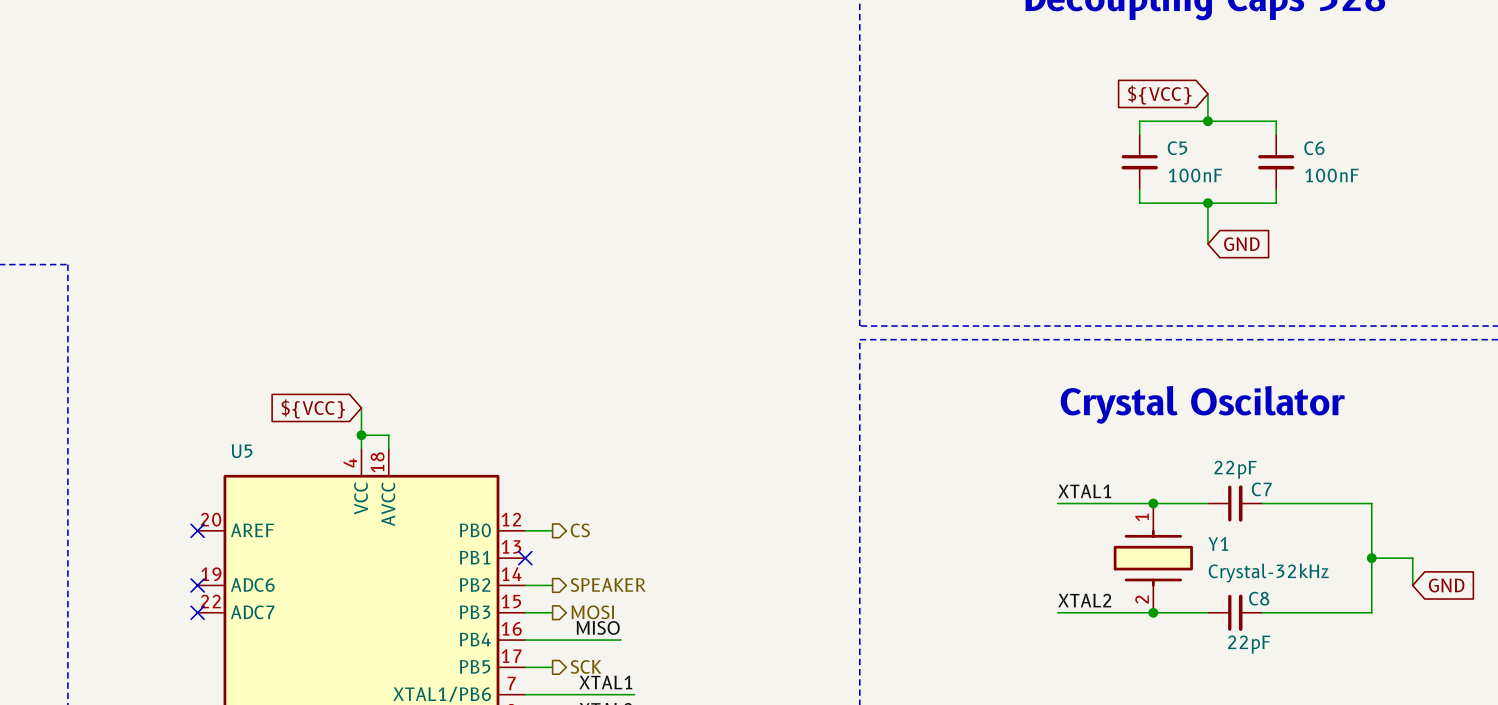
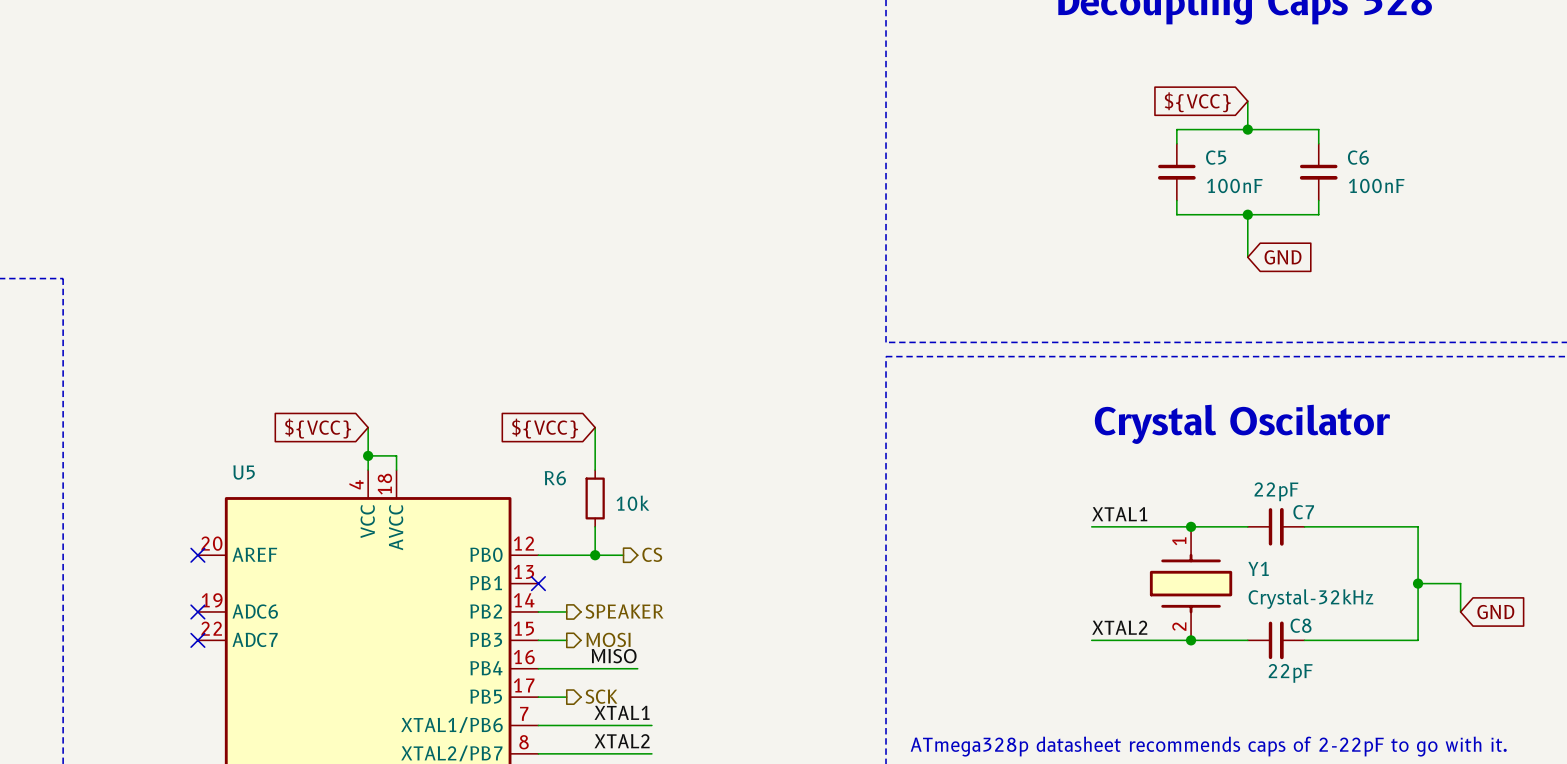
wire: none -> (595, 427) (595, 470)
global label: none -> ${VCC} (545, 428)
R6: none -> 10k (595, 498)
wire: none -> (595, 526) (595, 555)
wire: none -> (566, 555) (623, 555)
junction: none -> (595, 555)
hierarchical label position: CS (580, 530) -> CS (652, 554)

